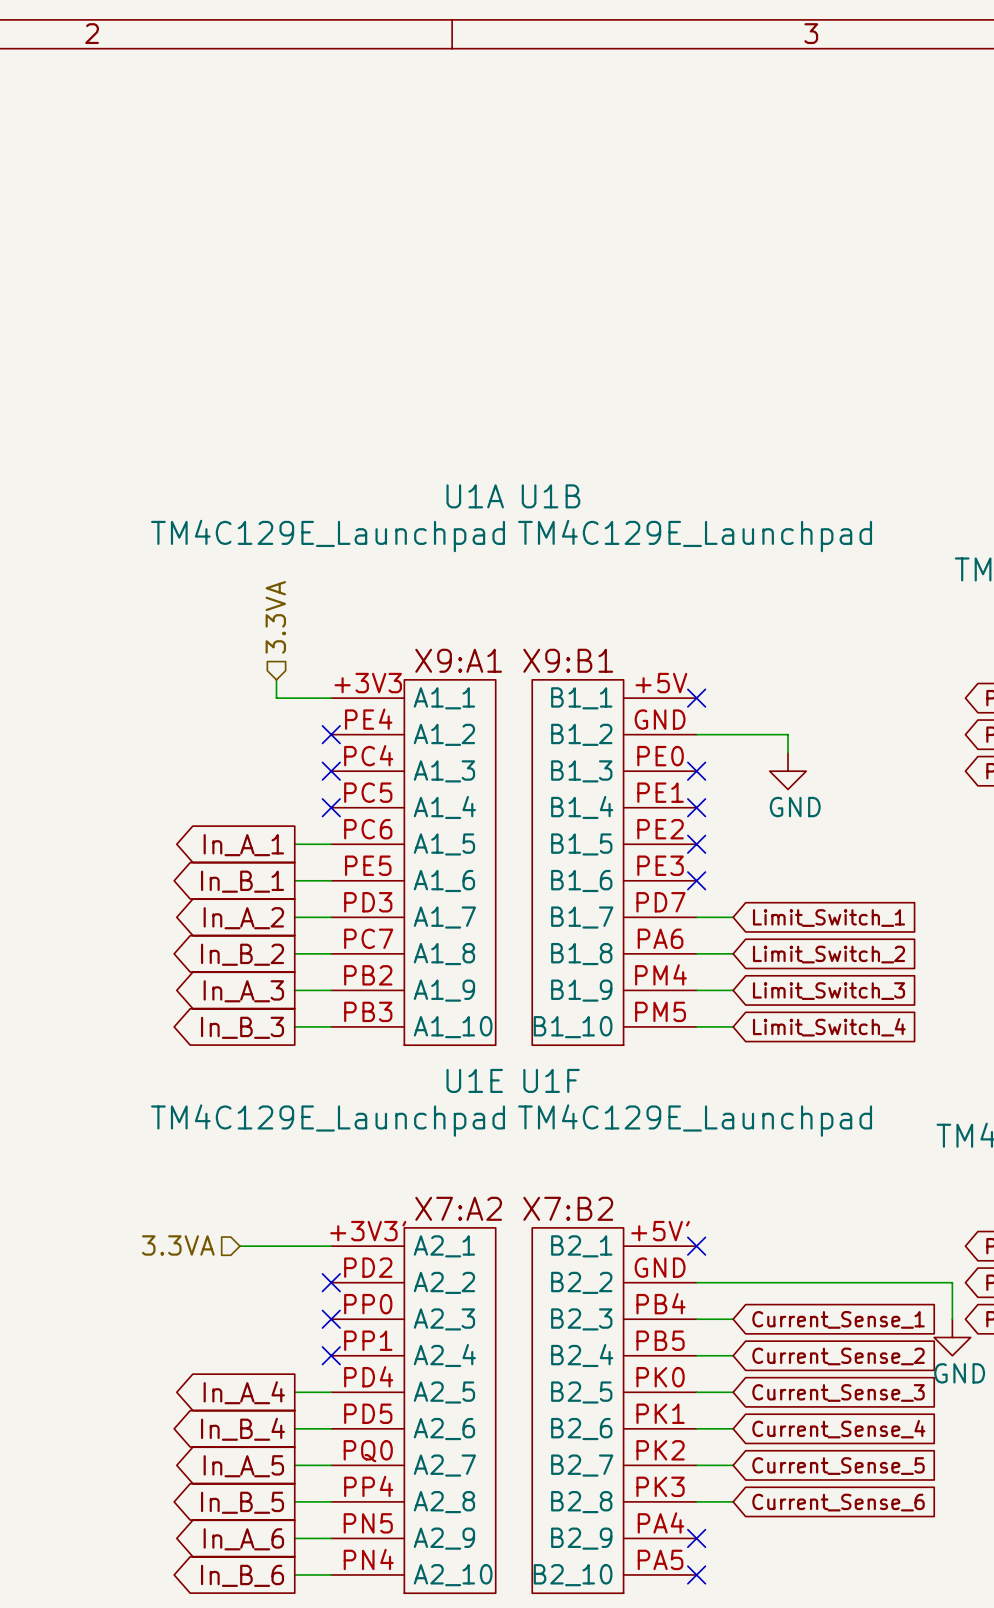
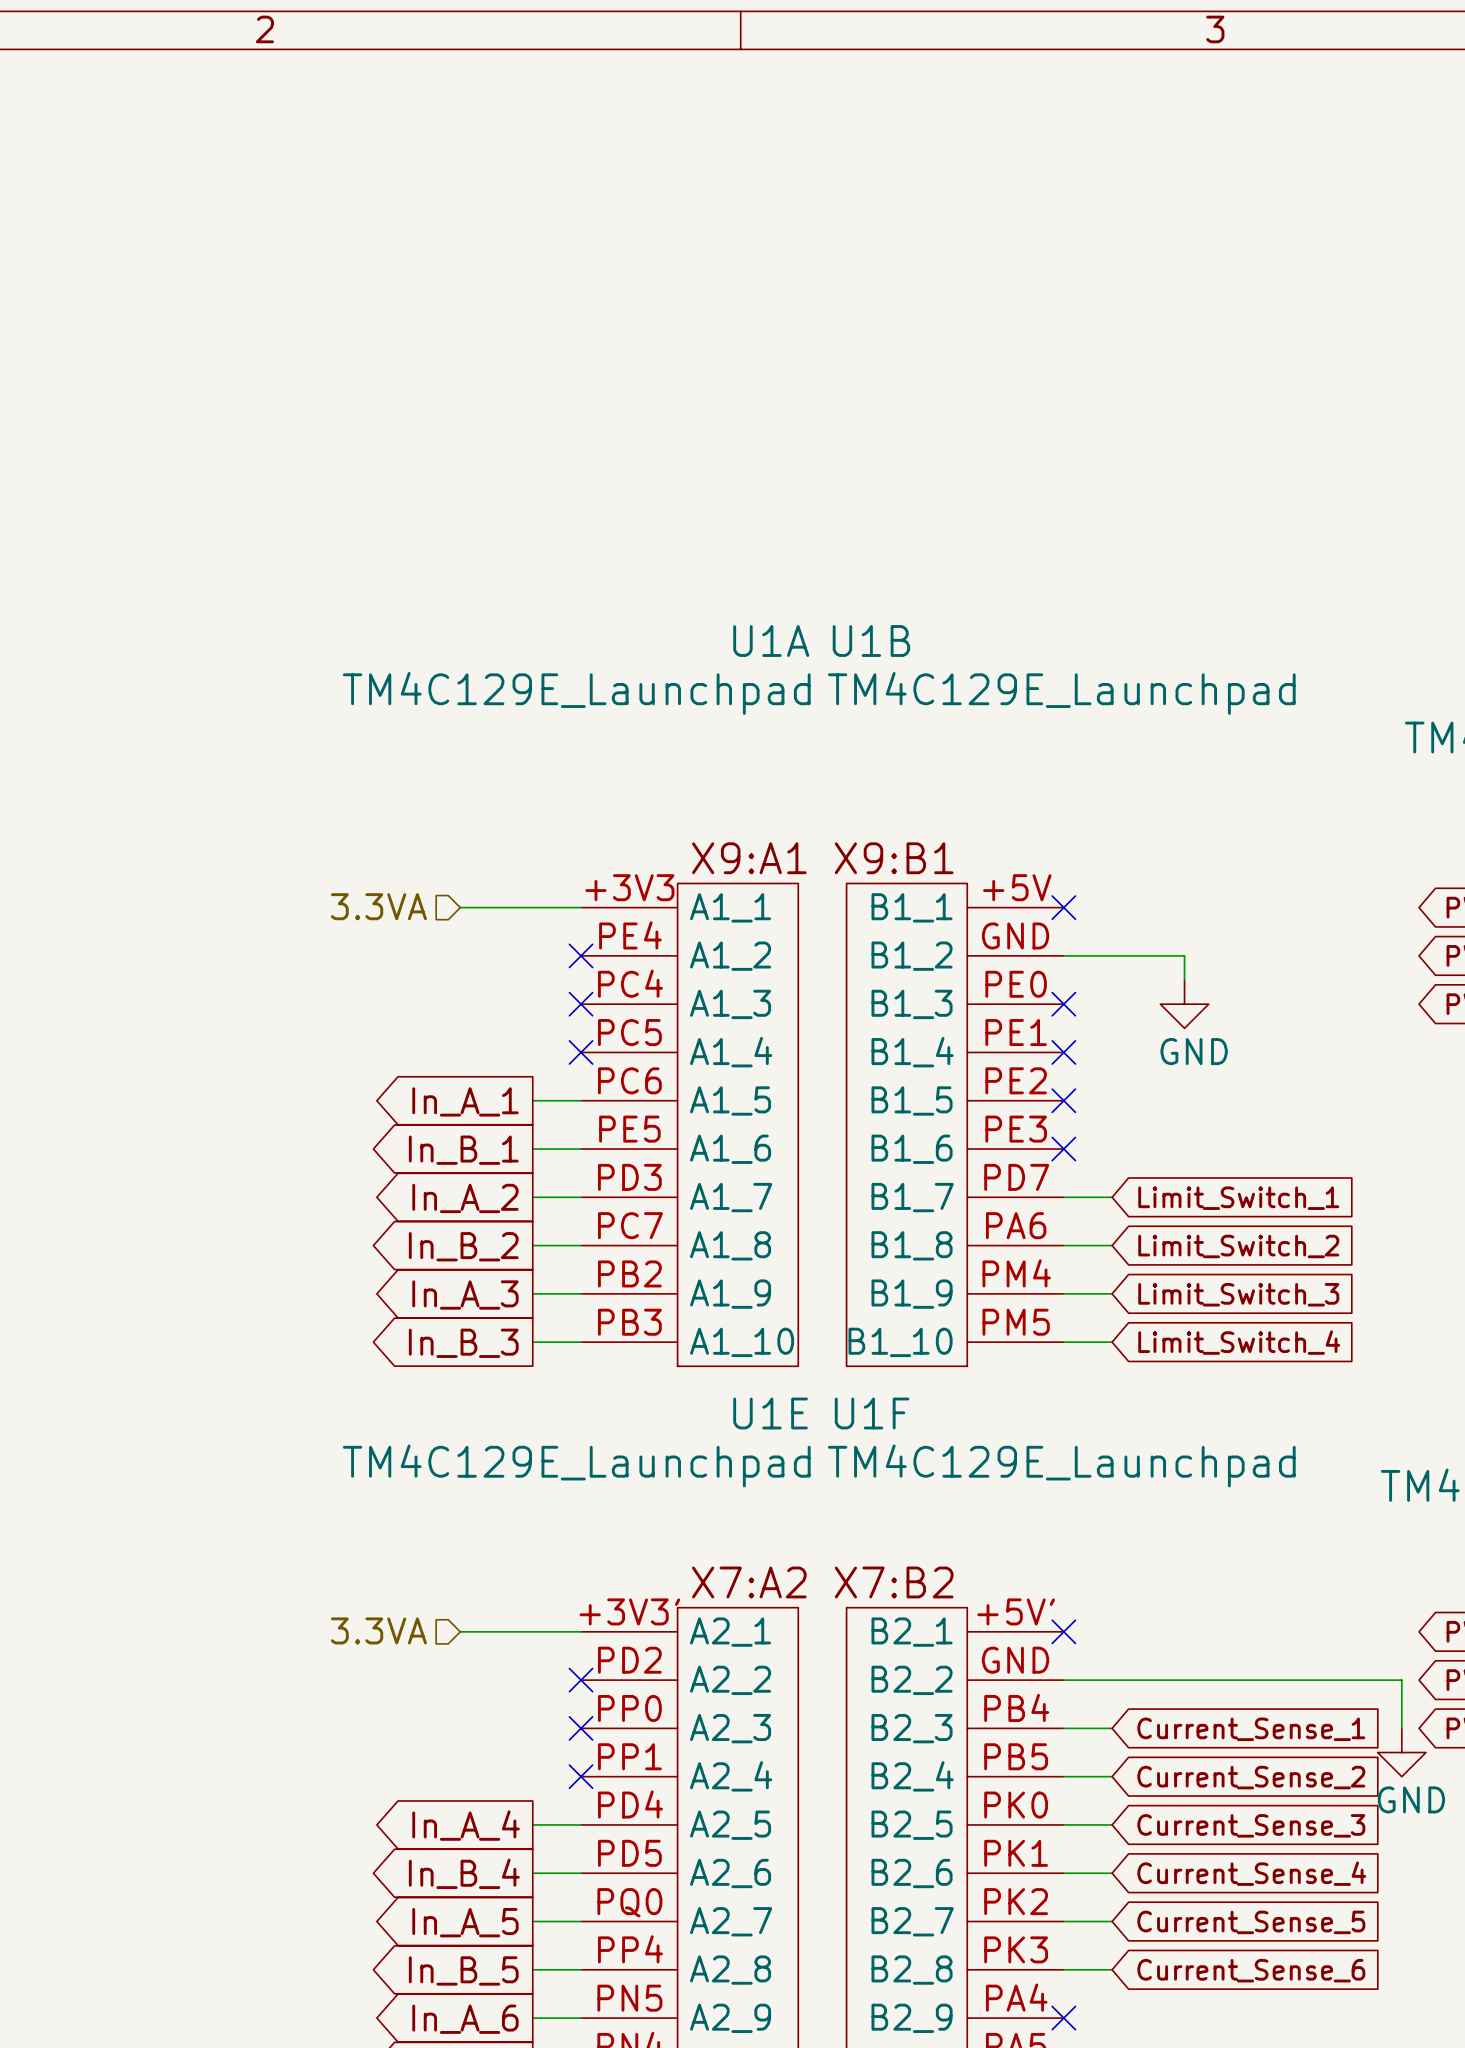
hierarchical label rotation: 0° (275, 617) -> 90° counterclockwise (378, 906)
hierarchical label position: 3.3VA (275, 617) -> 3.3VA (378, 906)
wire: (276, 679) (276, 698) -> (460, 907) (508, 907)

